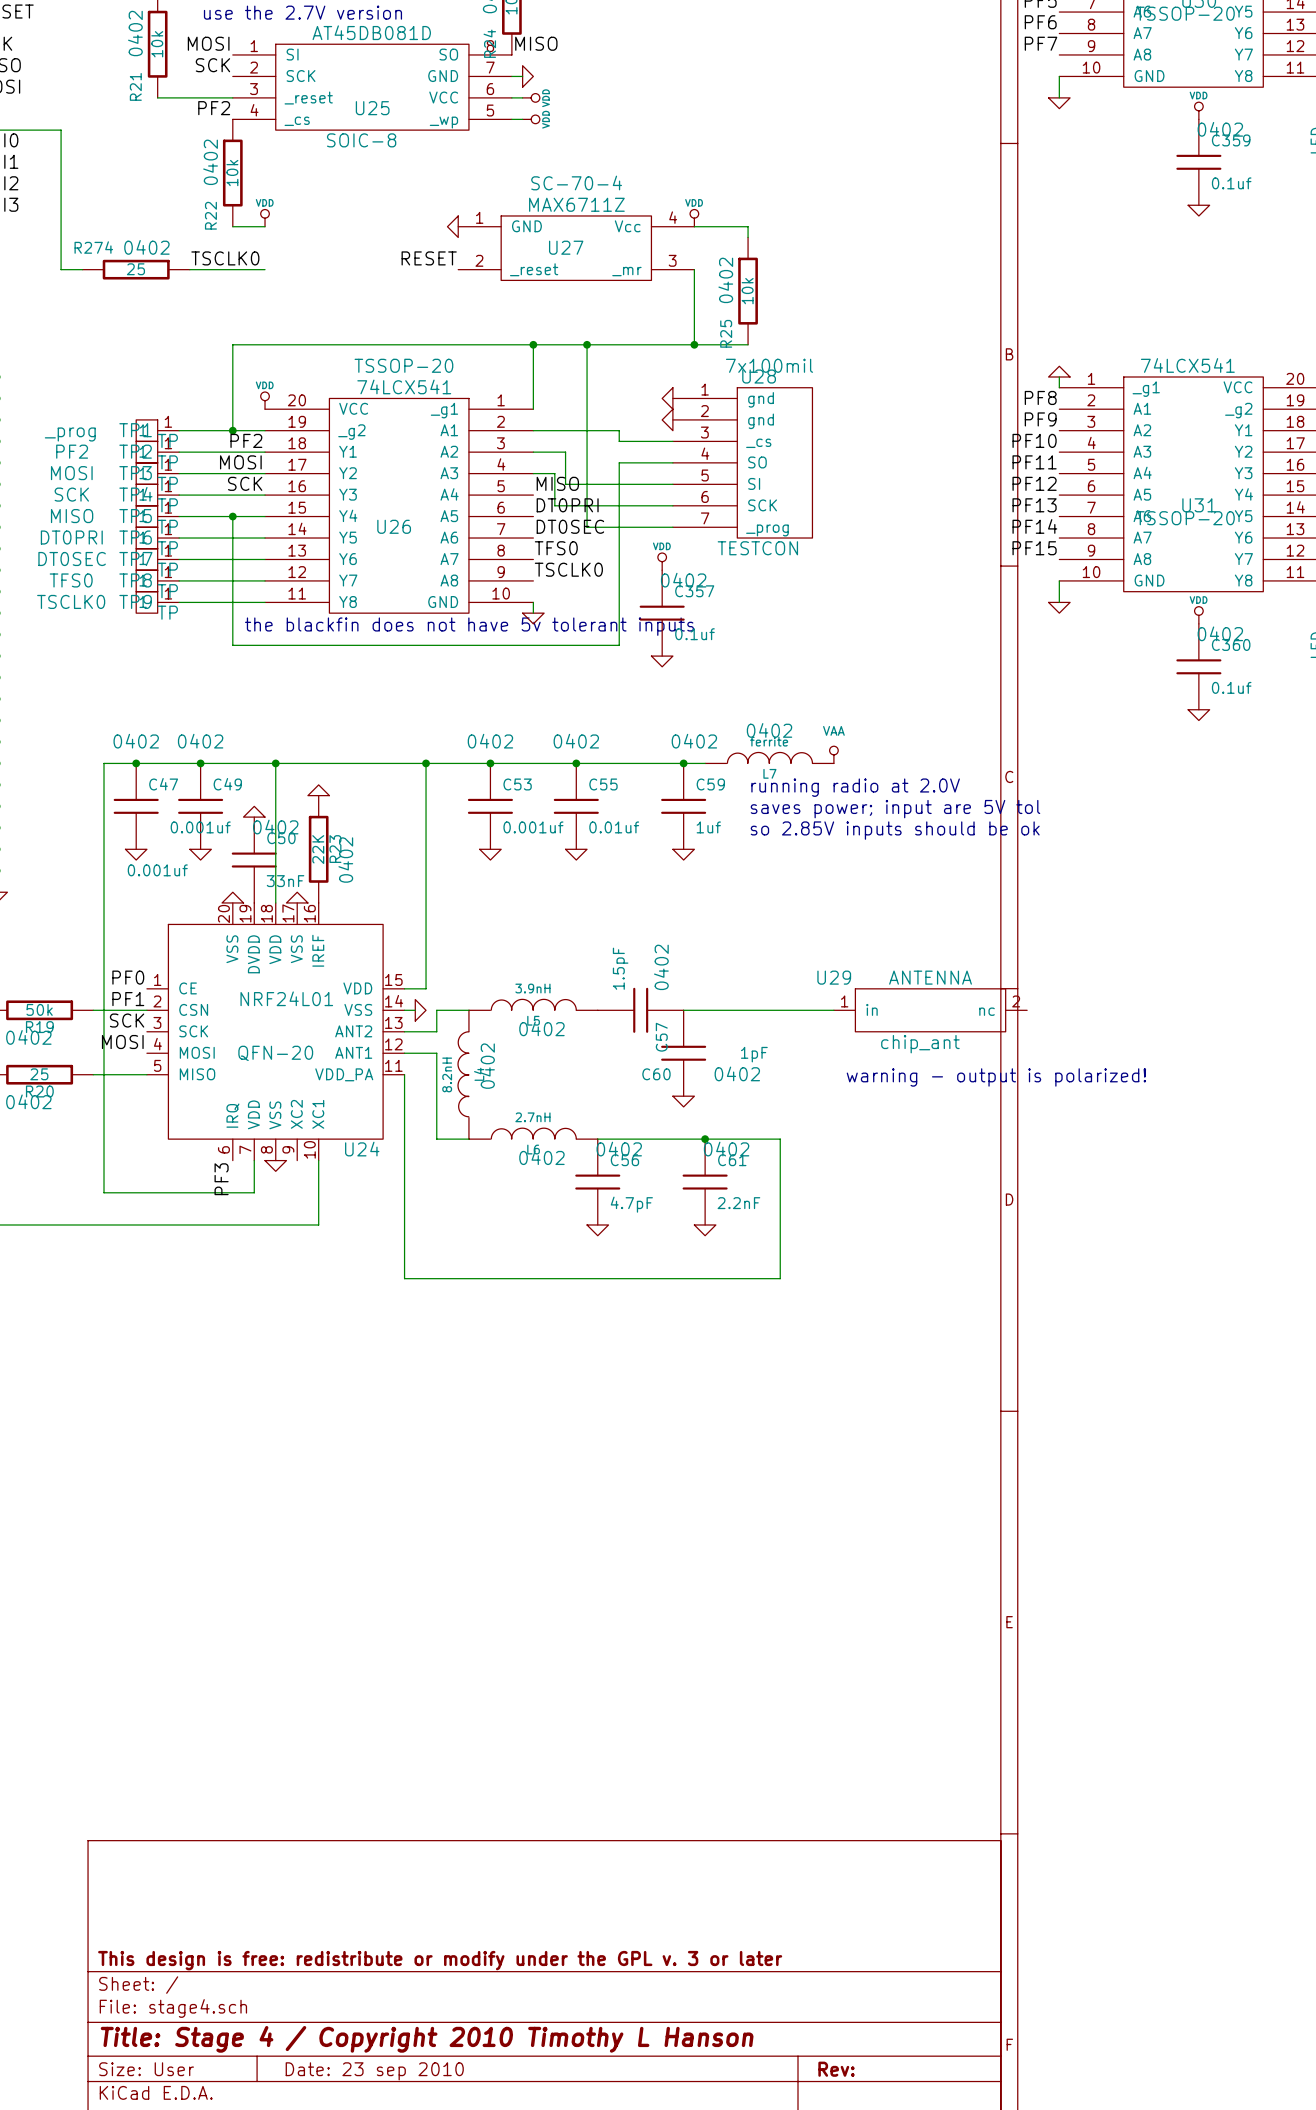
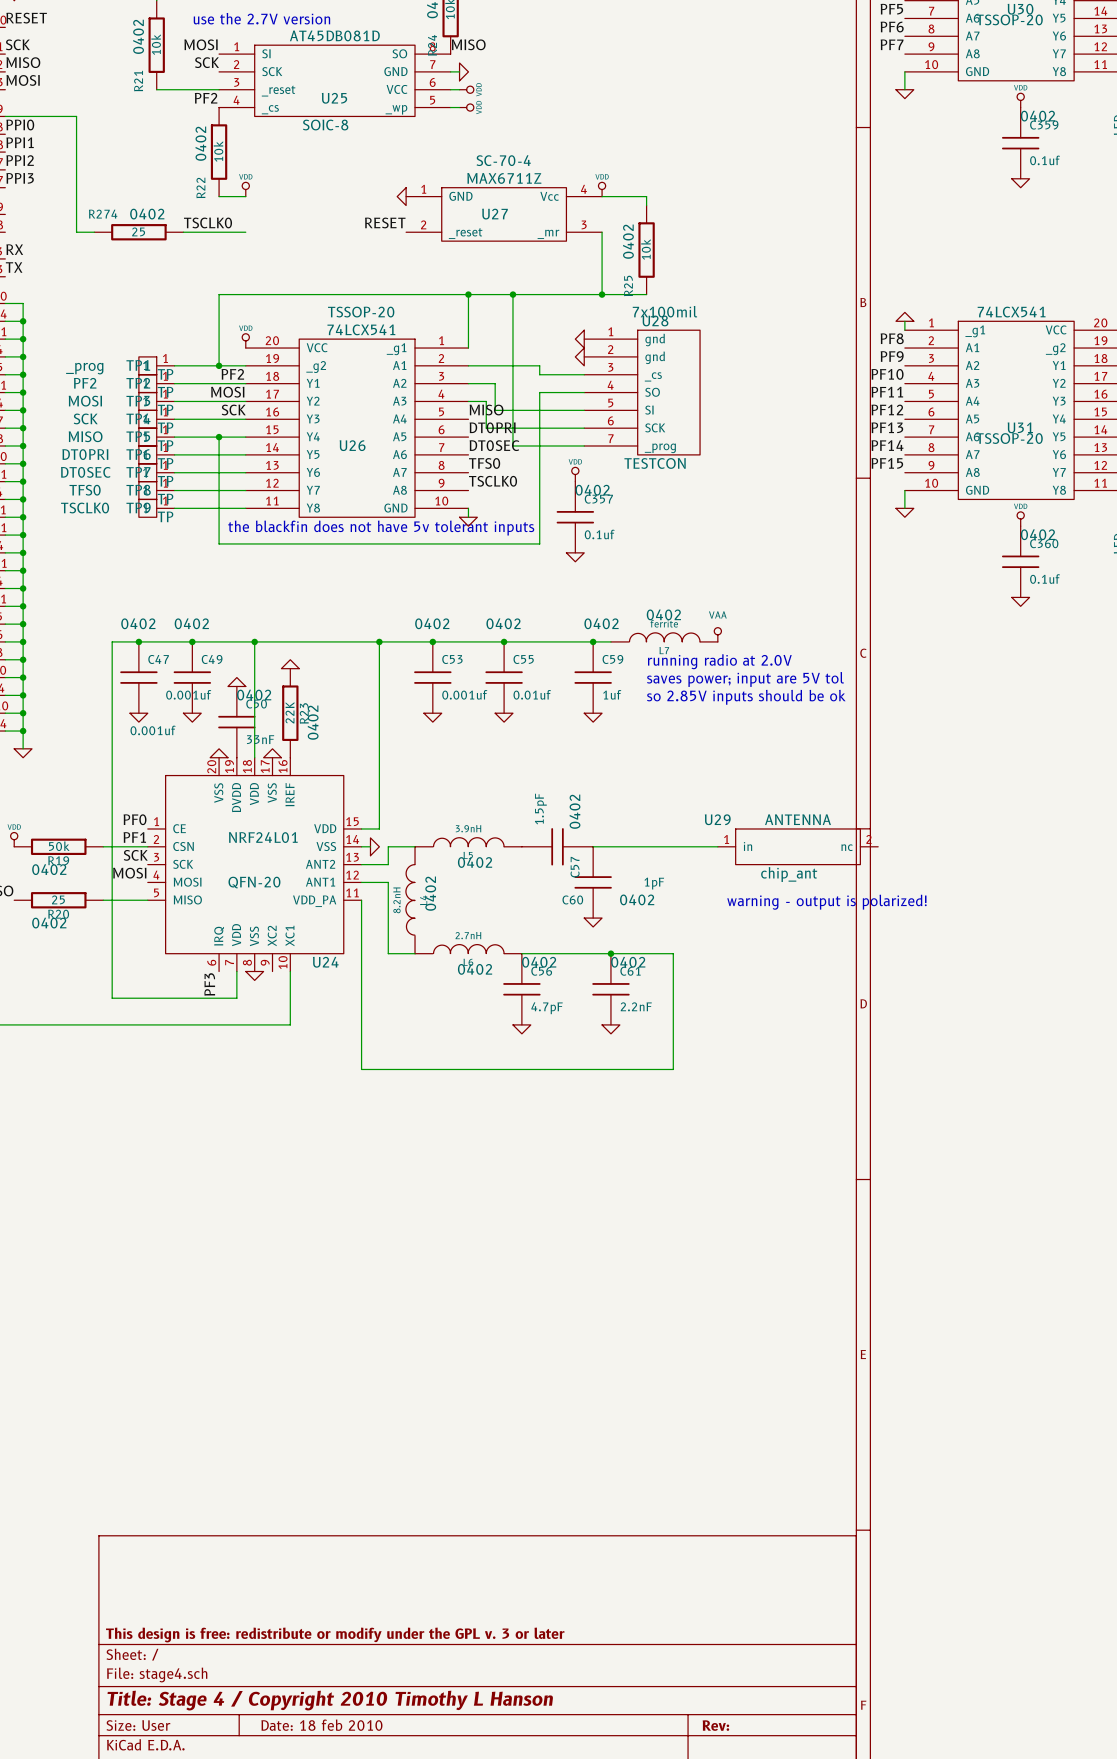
title block: Date: 23 sep 2010 (374, 2071) -> Date: 18 feb 2010 (321, 1725)

